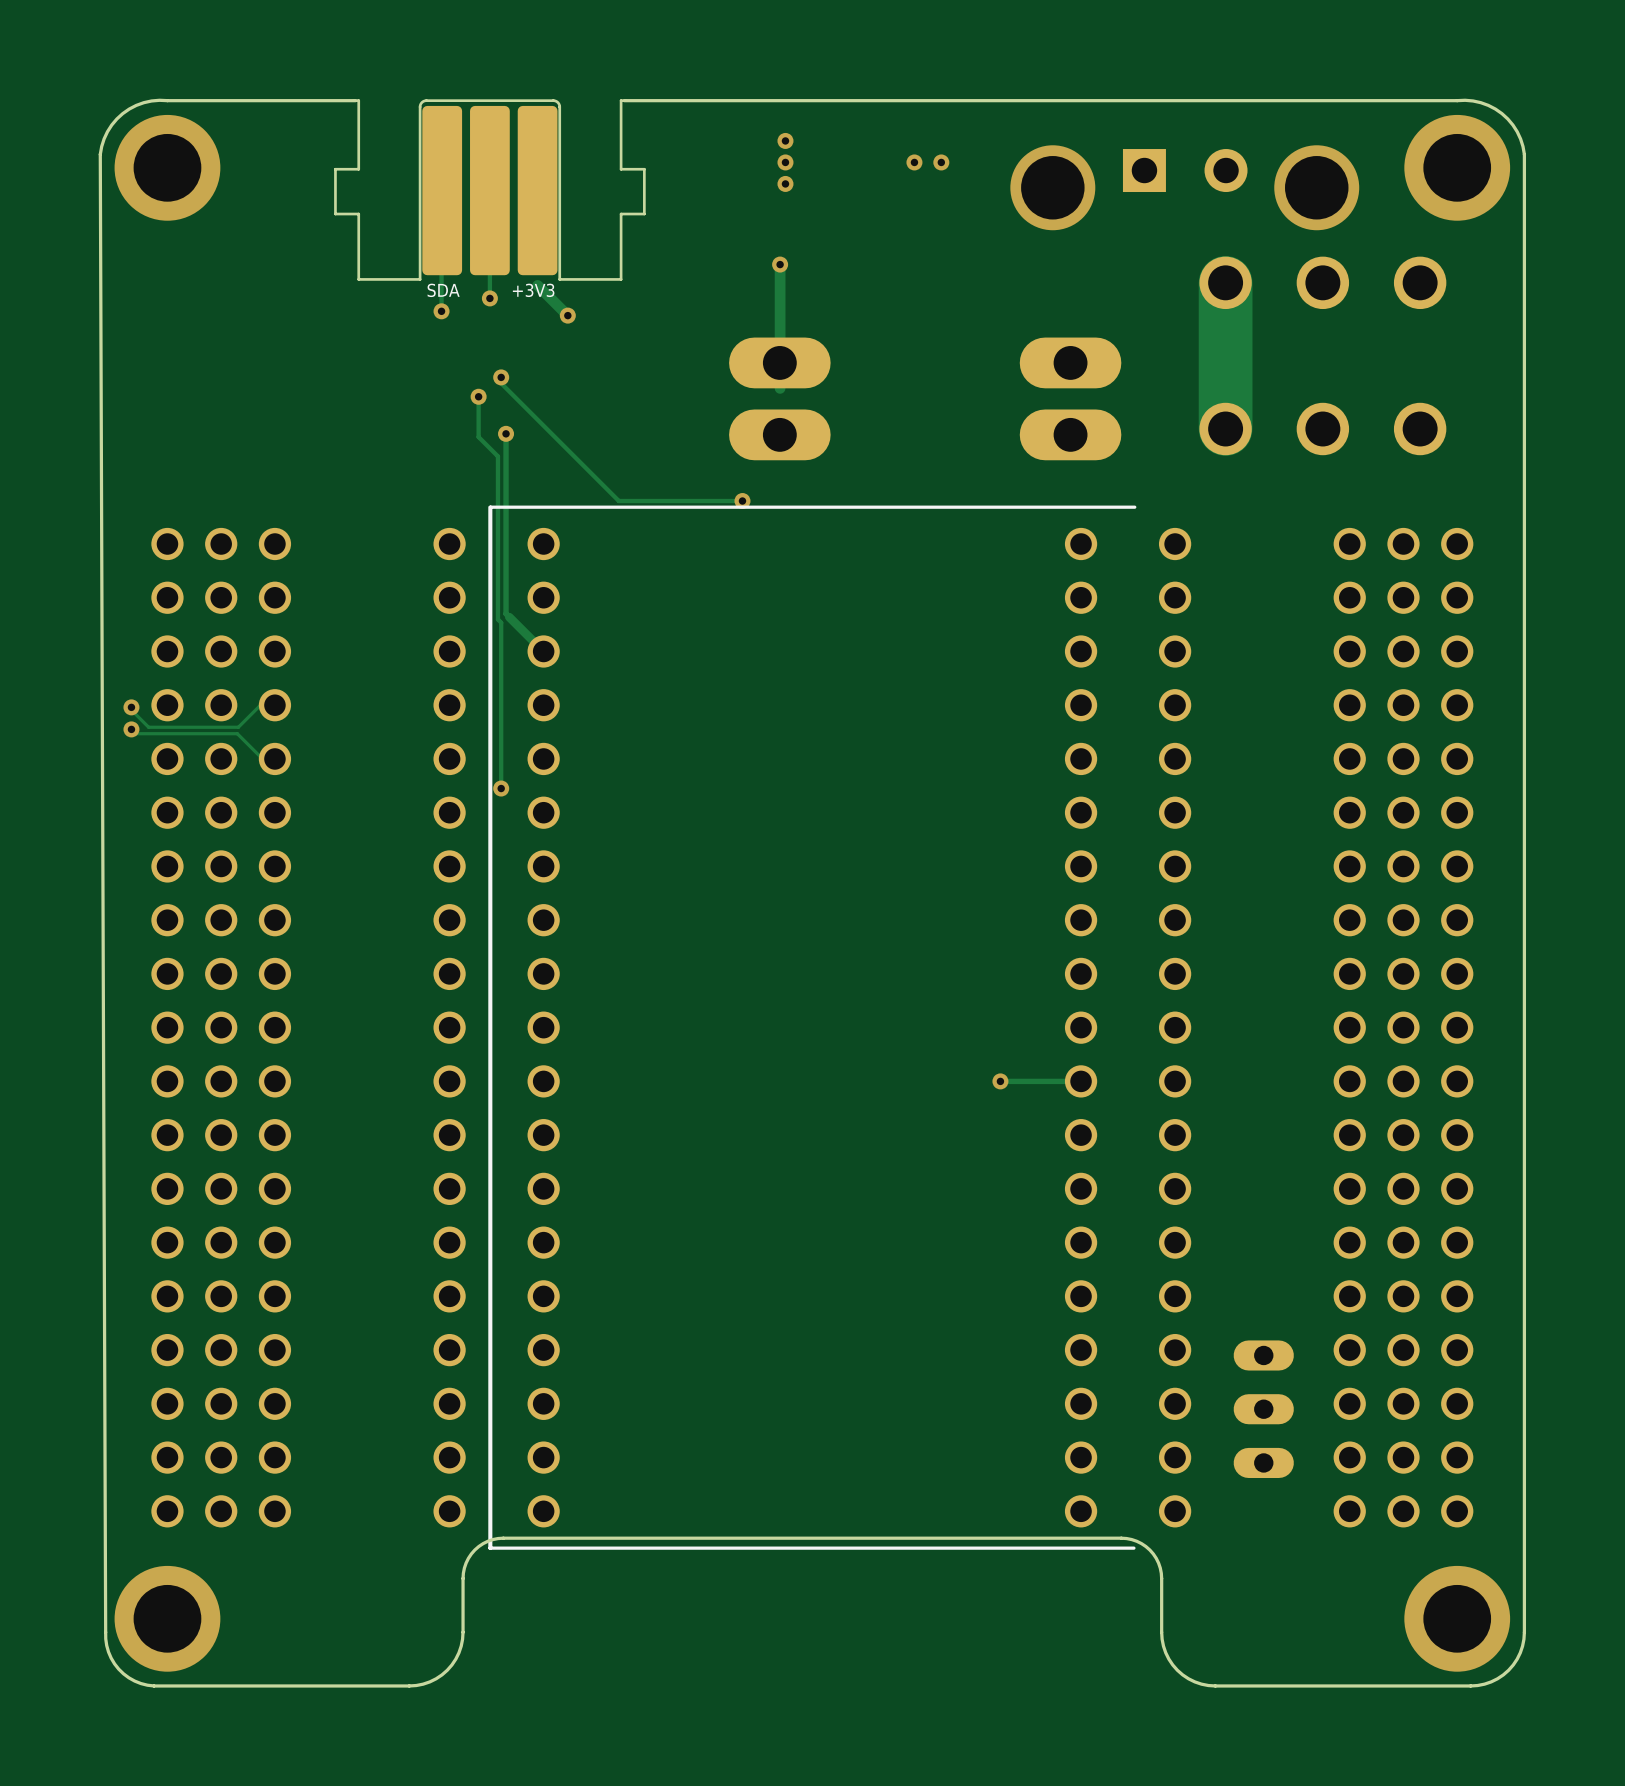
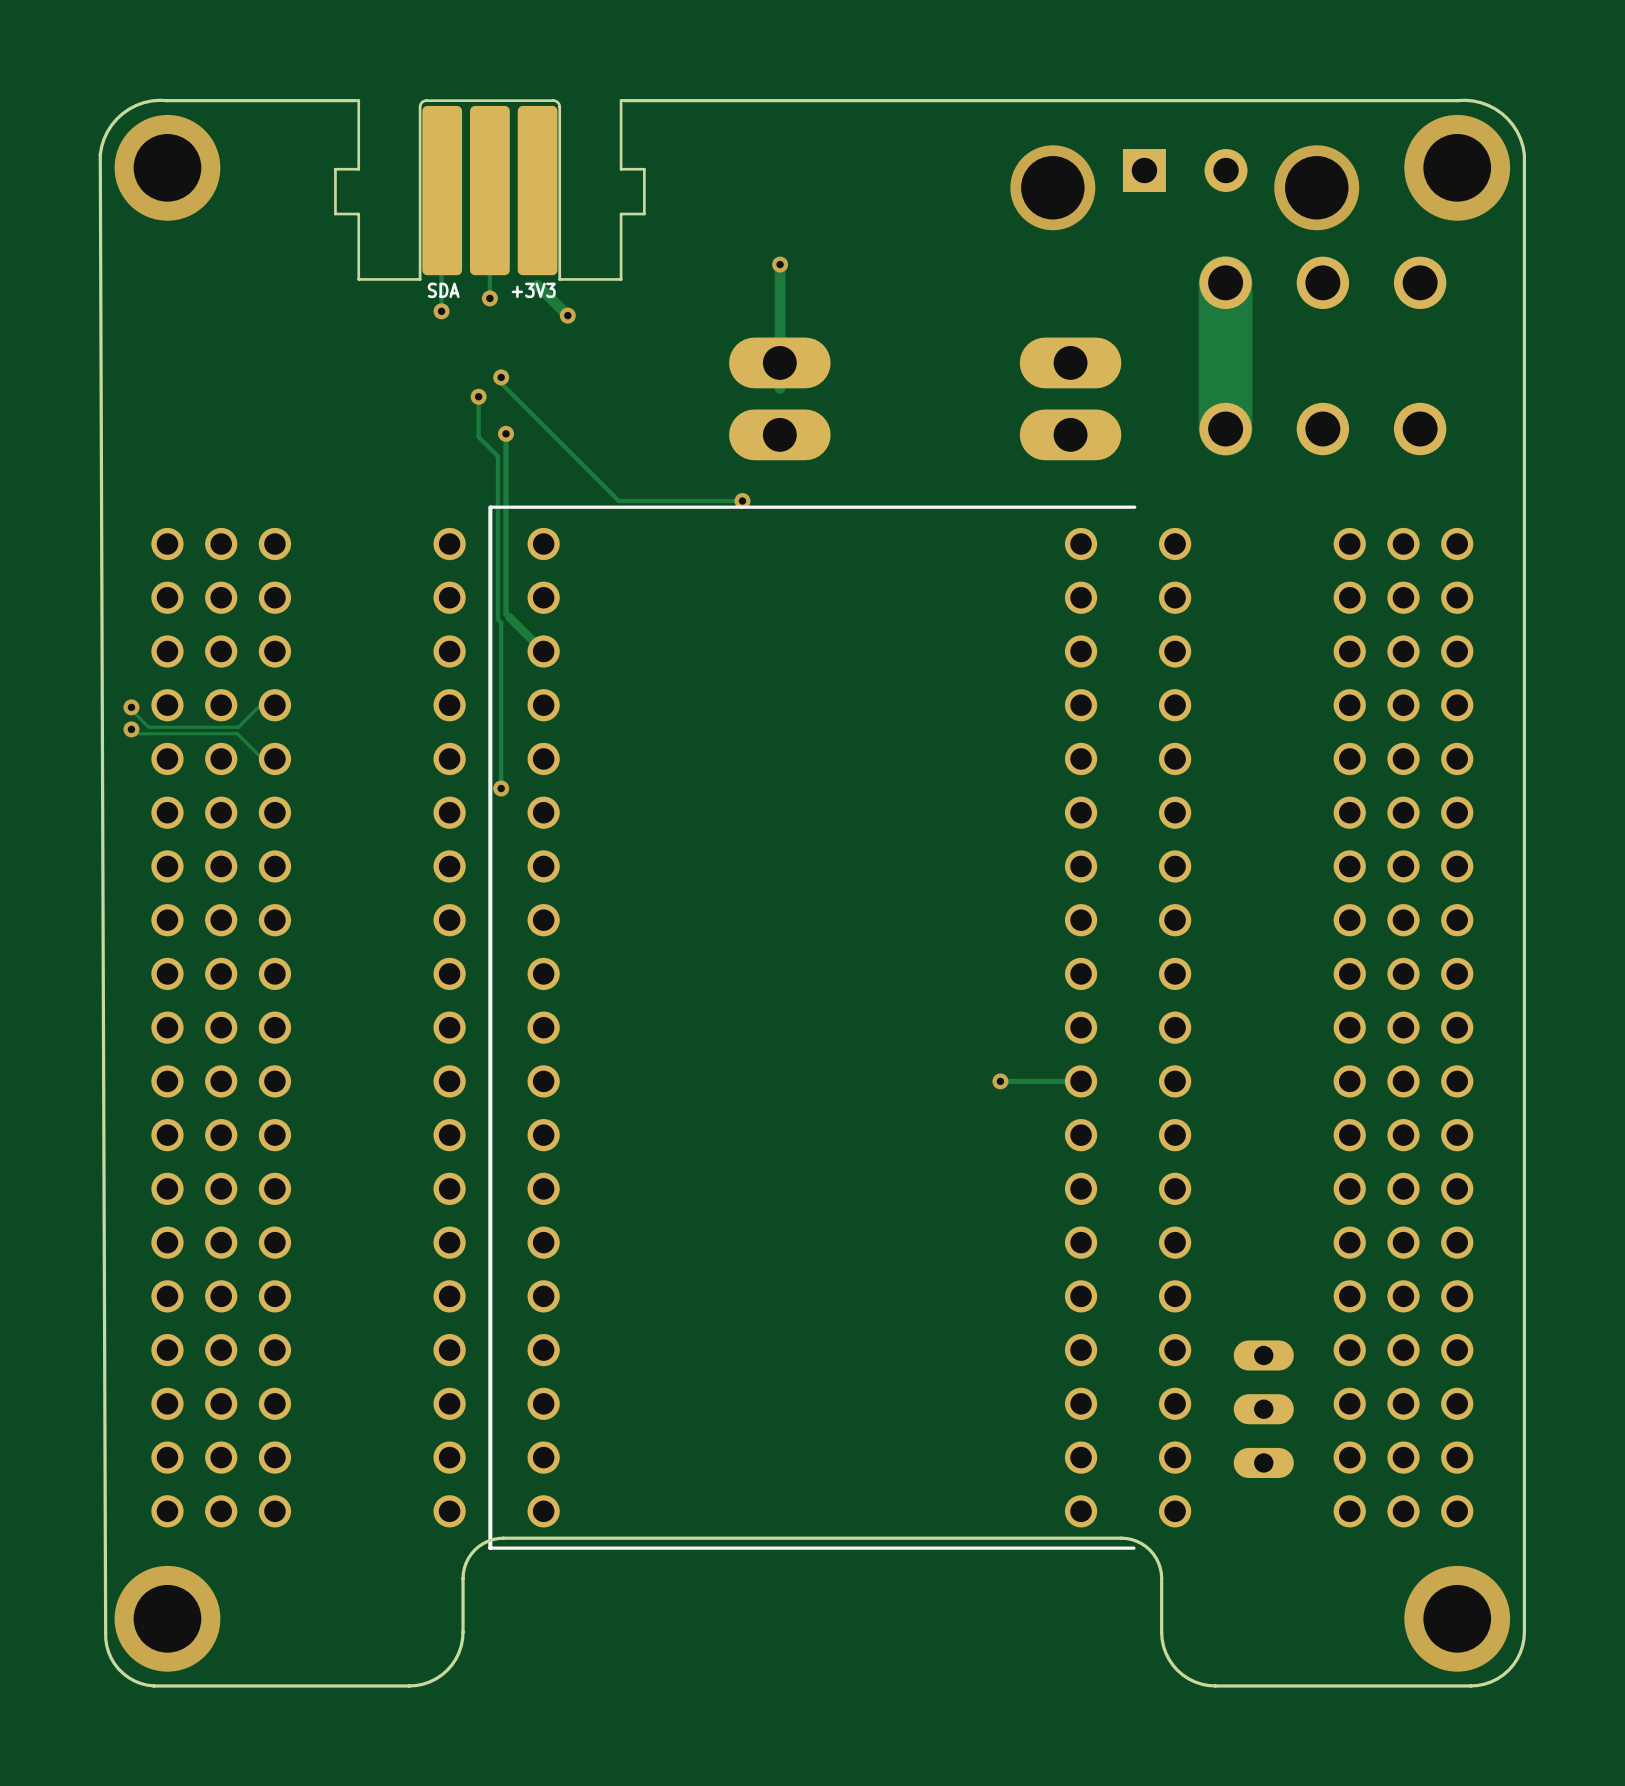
via: (785, 140) -> none
via: (785, 162) -> none
via: (914, 162) -> none
via: (941, 162) -> none
via: (785, 183) -> none

